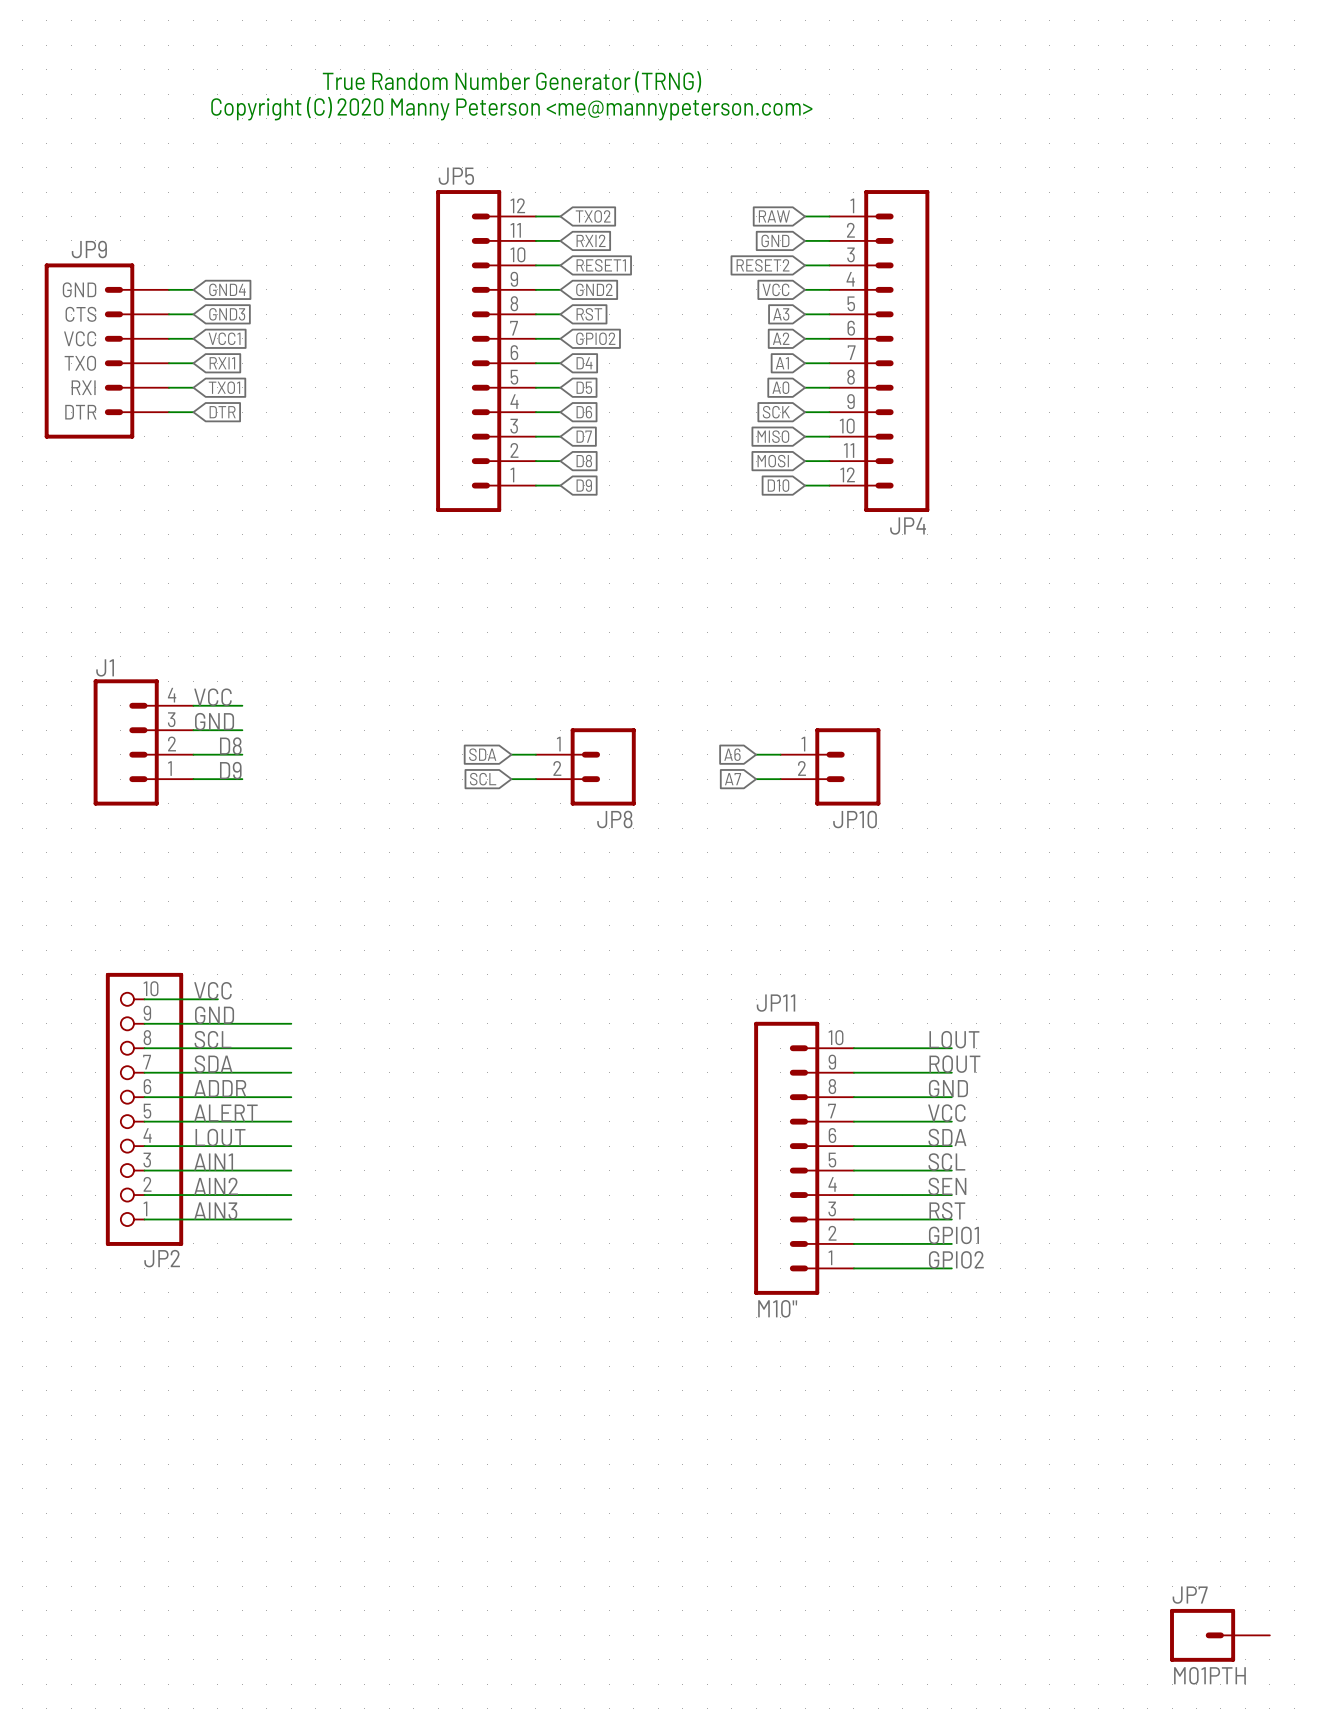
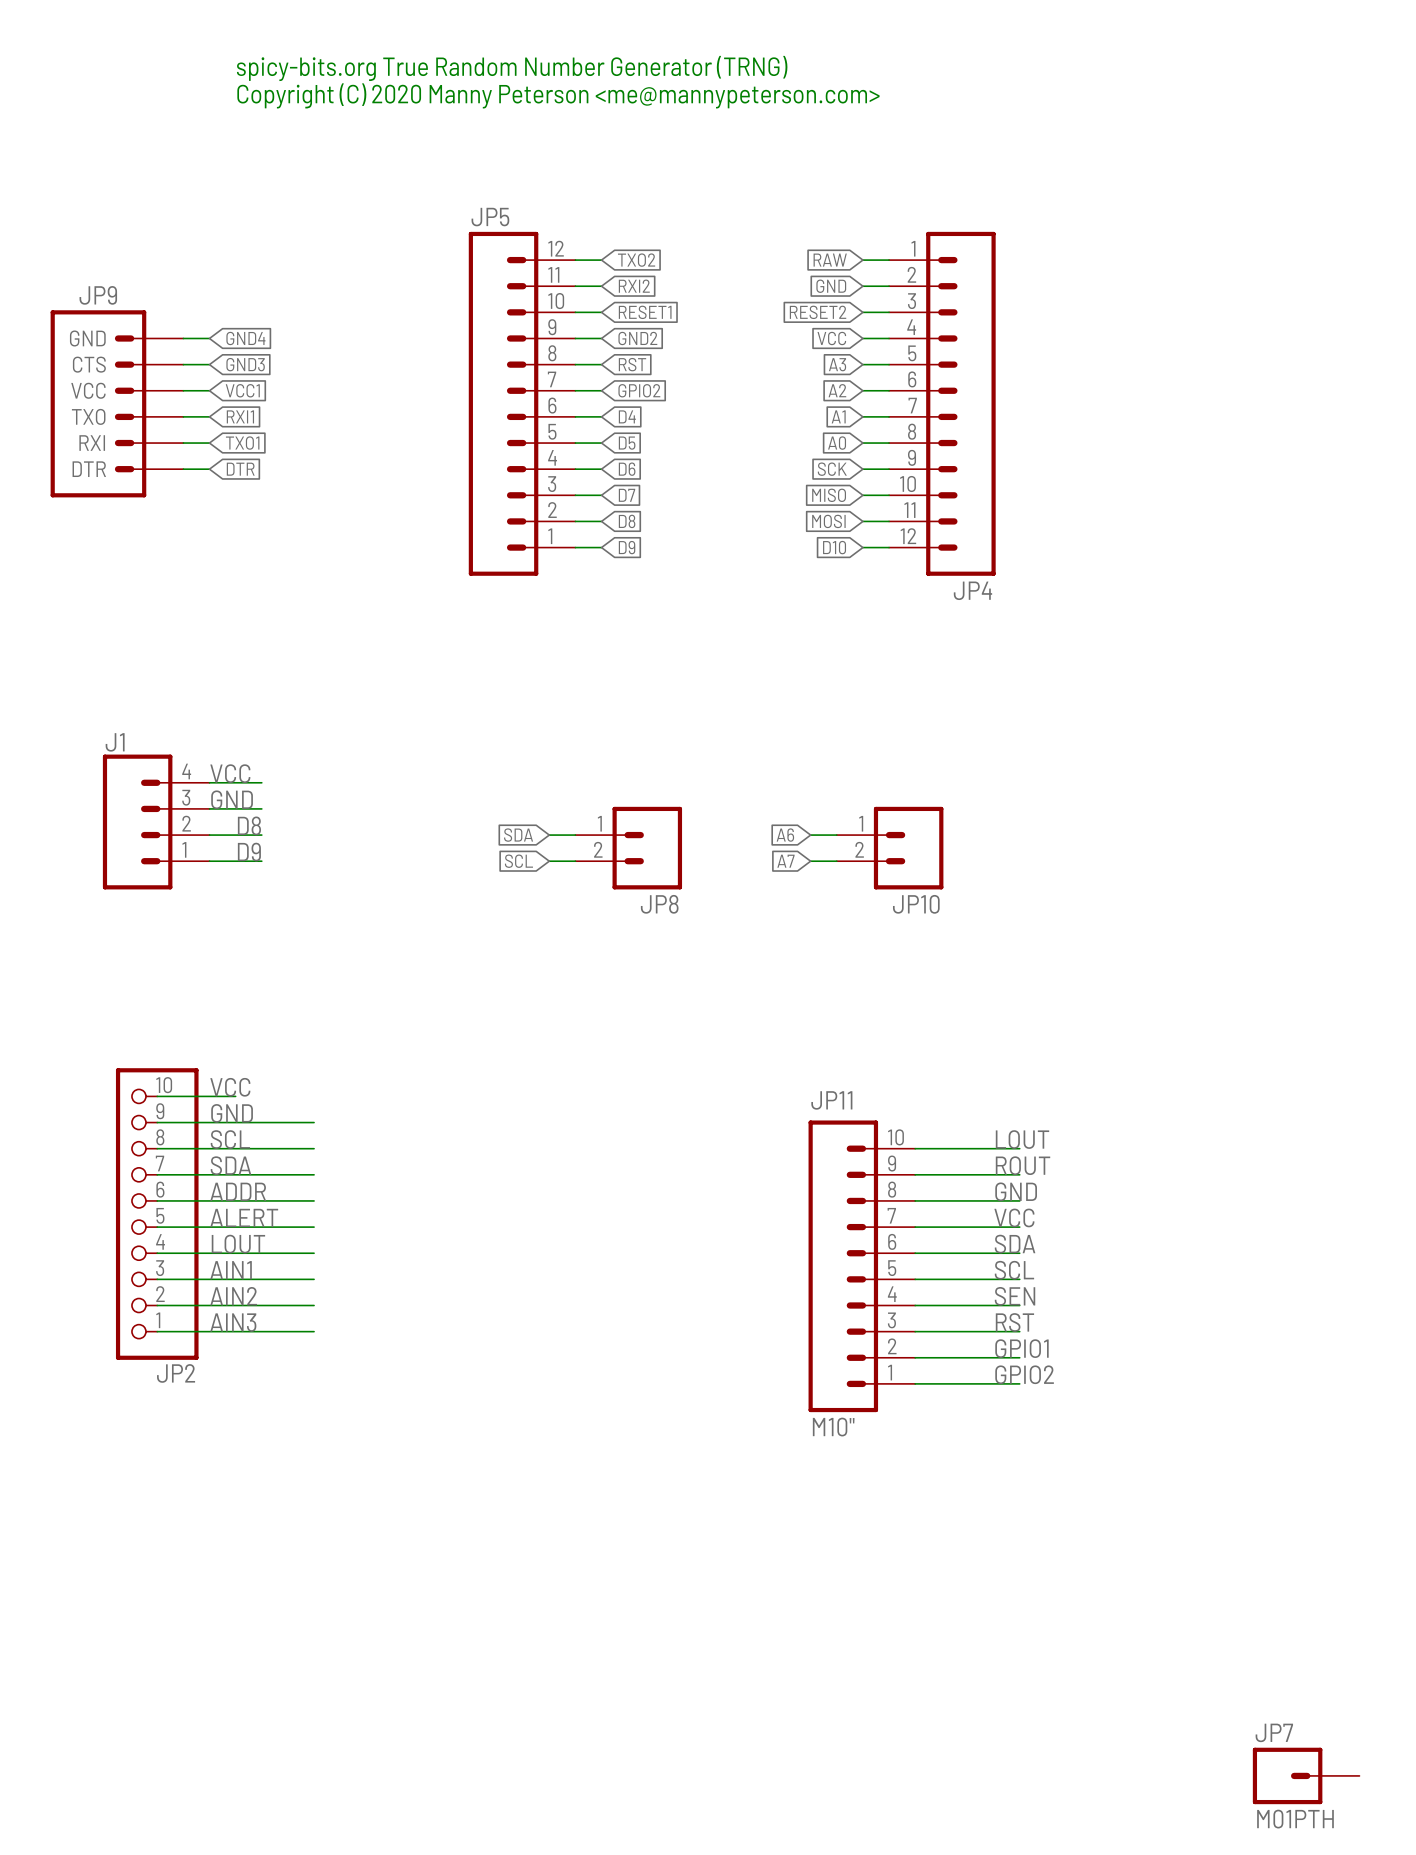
text: none -> spicy-bits.org True Random Number Generator (TRNG) (512, 68)
text: none -> Copyright (C) 2020 Manny Peterson <me@mannypeterson.com> (558, 95)
text: True Random Number Generator (TRNG) (511, 81) -> none
text: Copyright (C) 2020 Manny Peterson <me@mannypeterson.com> (511, 108) -> none

